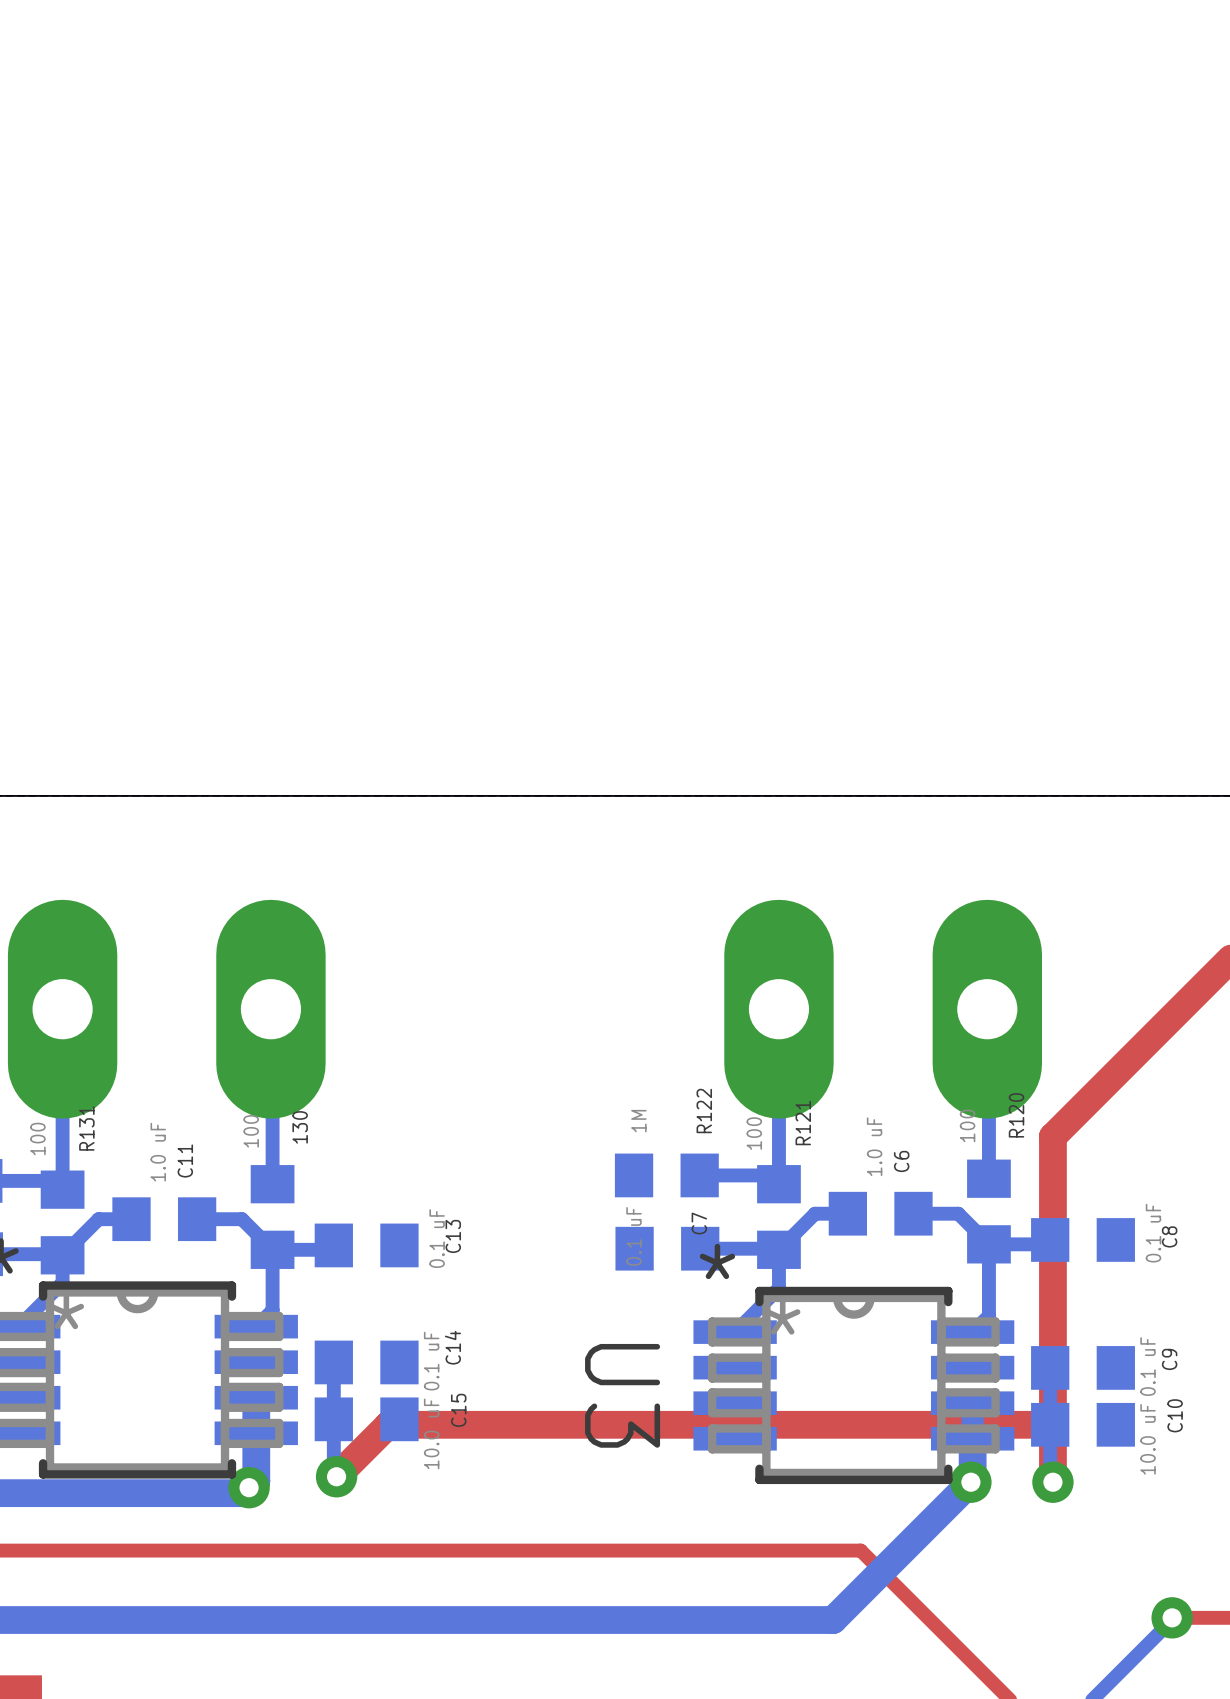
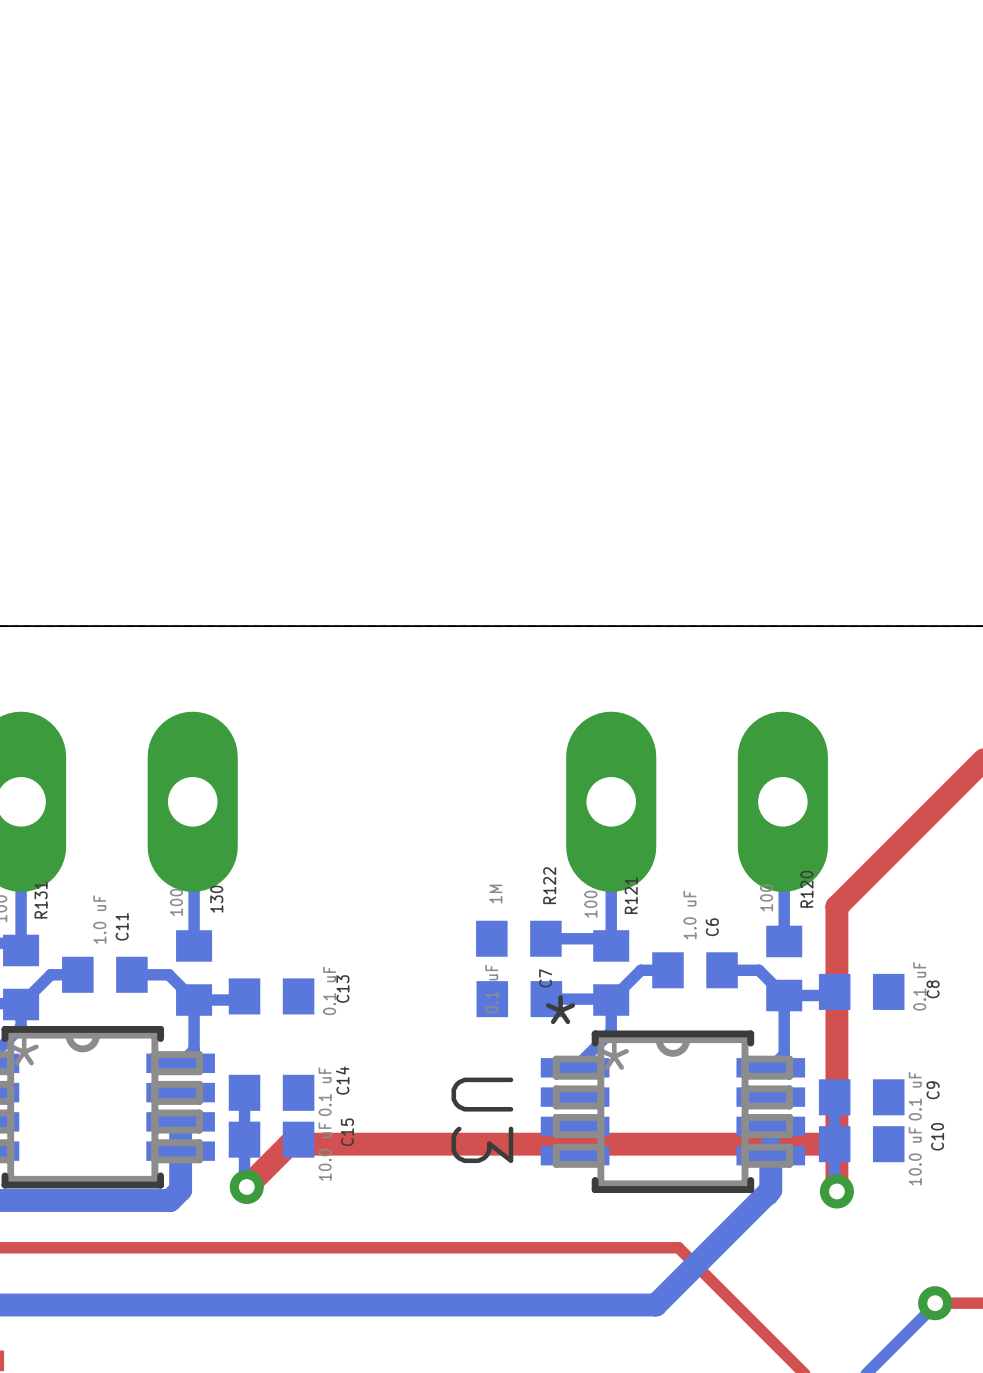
via: (970, 1482) -> none
via: (249, 1487) -> none

